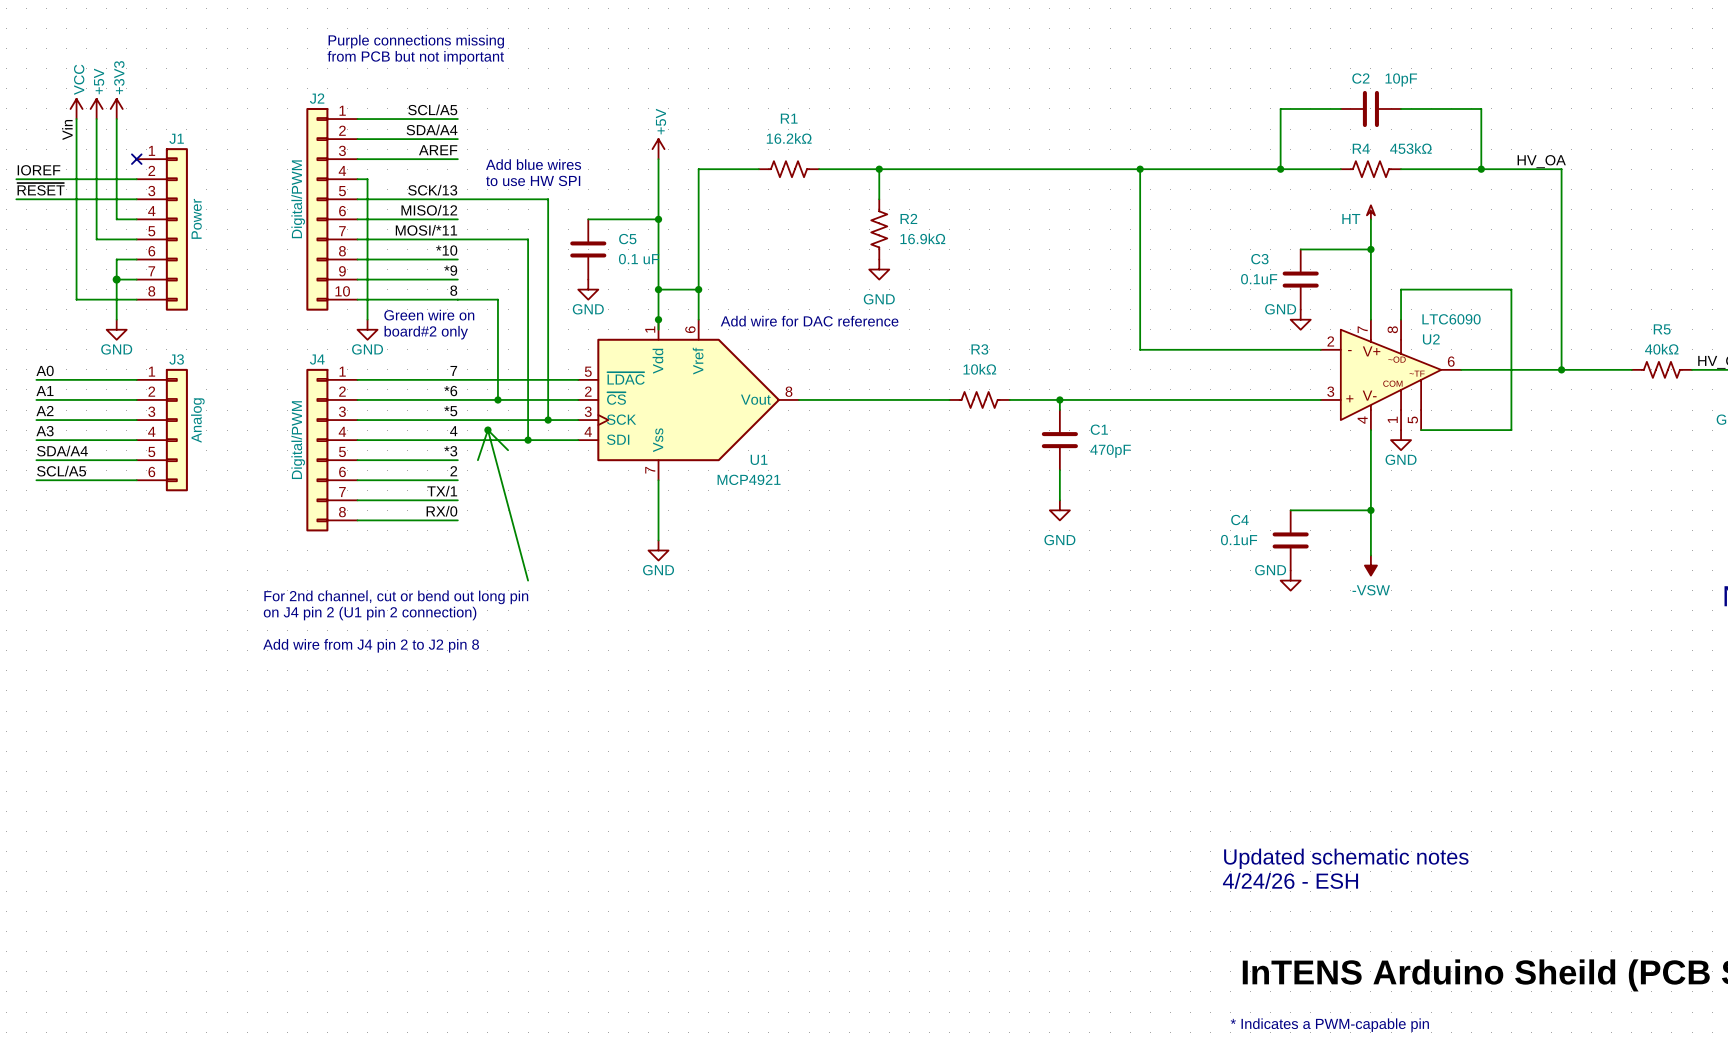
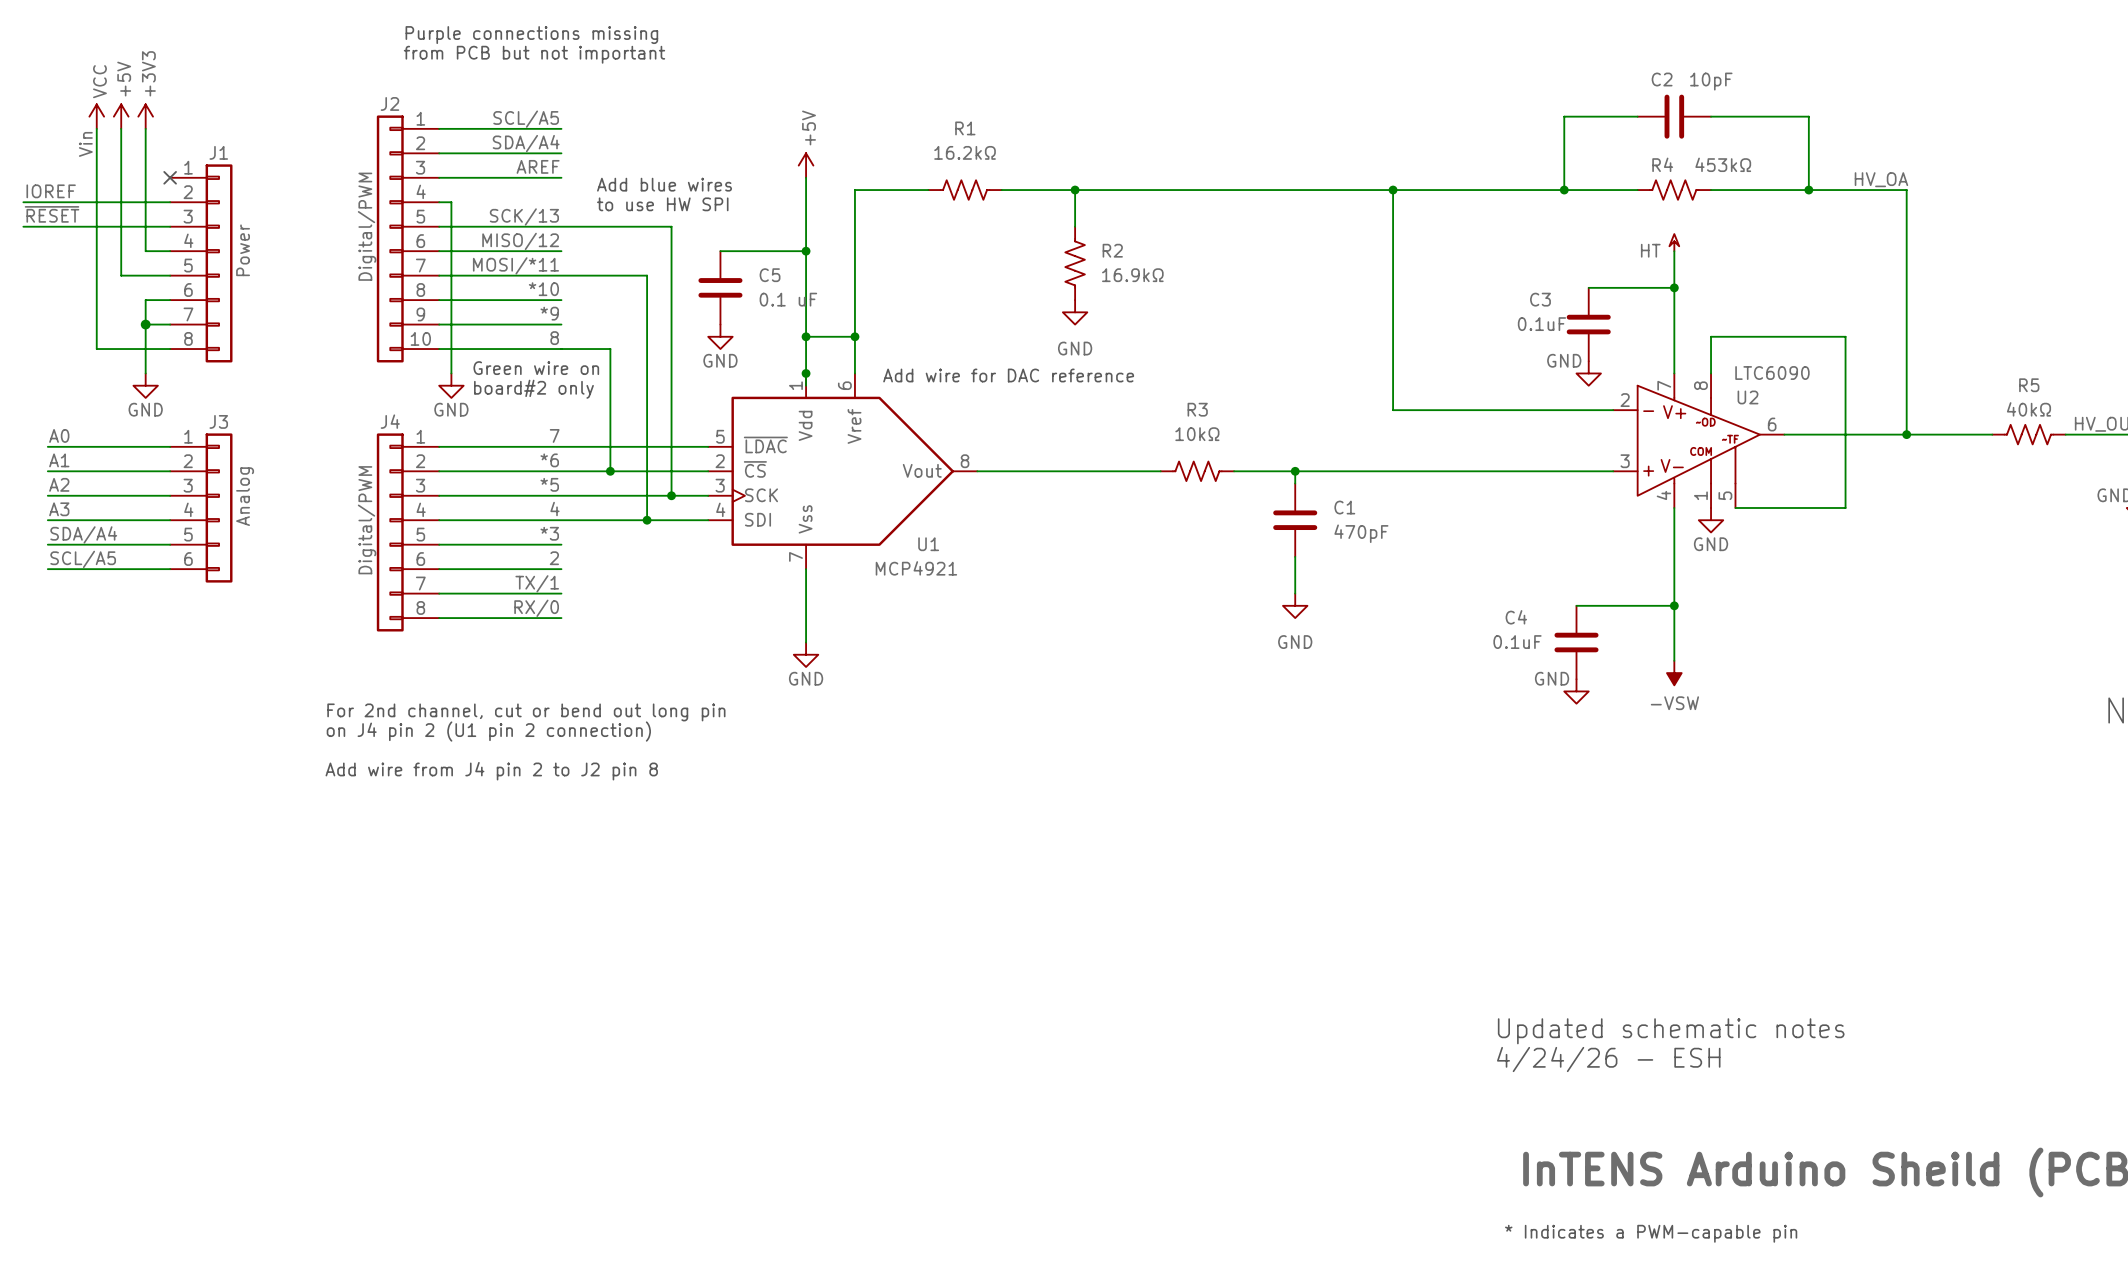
wire: (487, 430) (508, 450) -> none
wire: (487, 430) (477, 460) -> none
wire: (487, 430) (528, 580) -> none
junction: (487, 430) -> none

